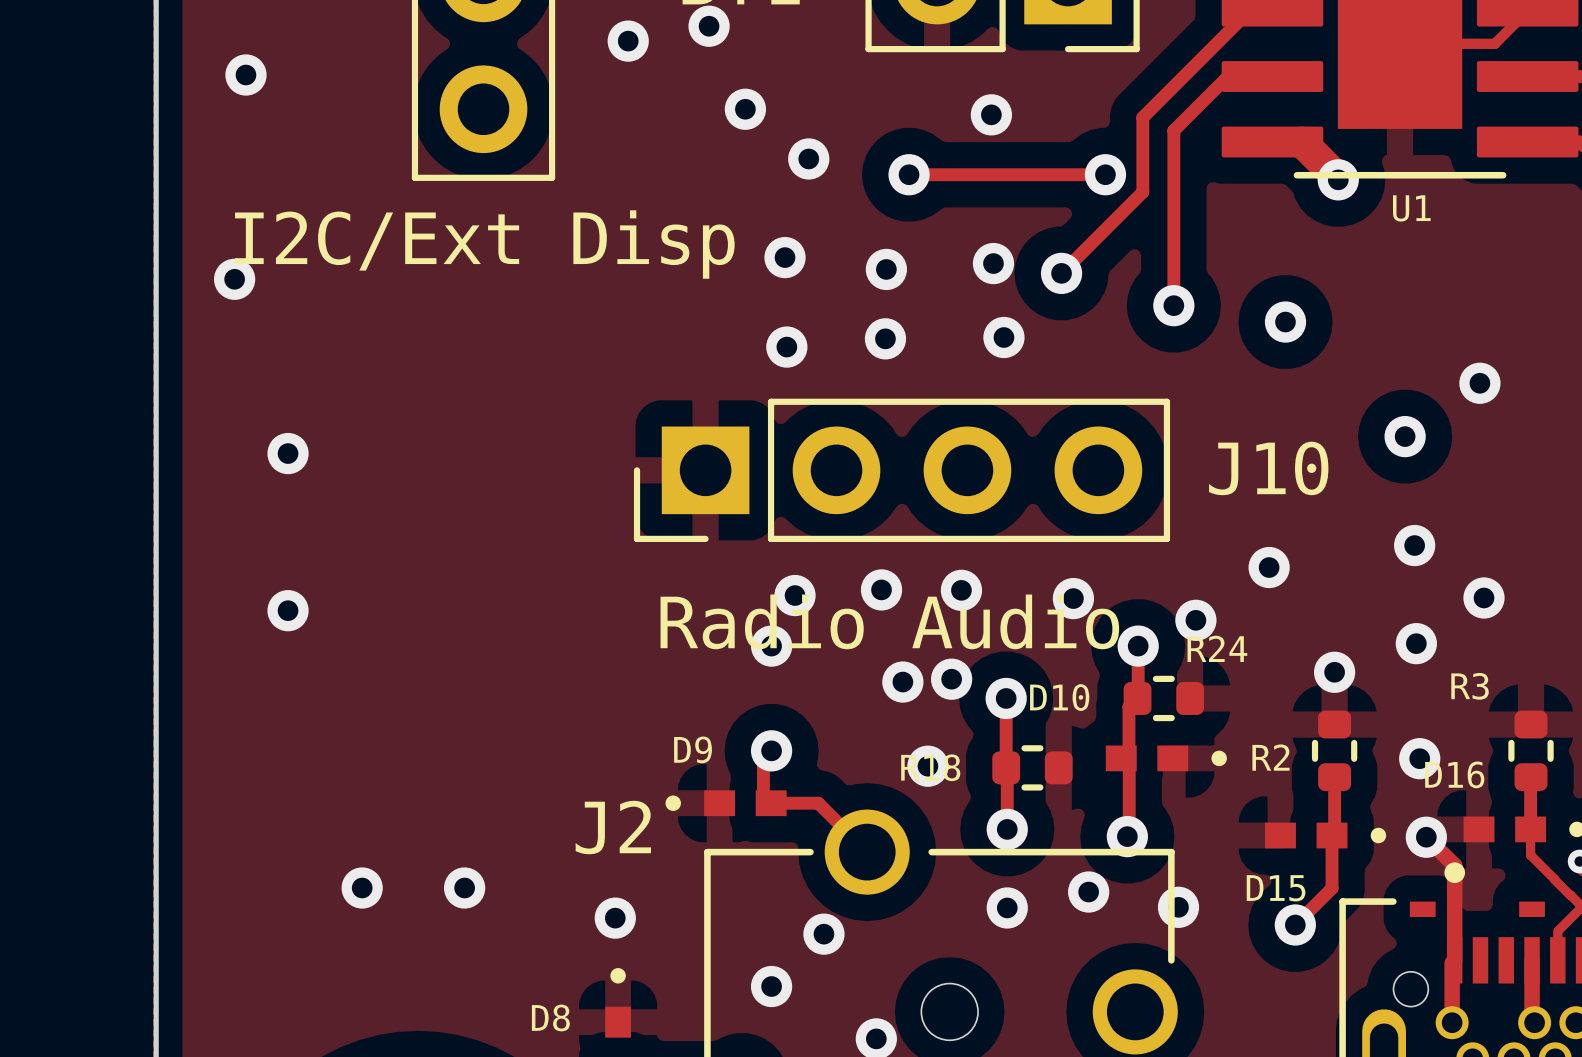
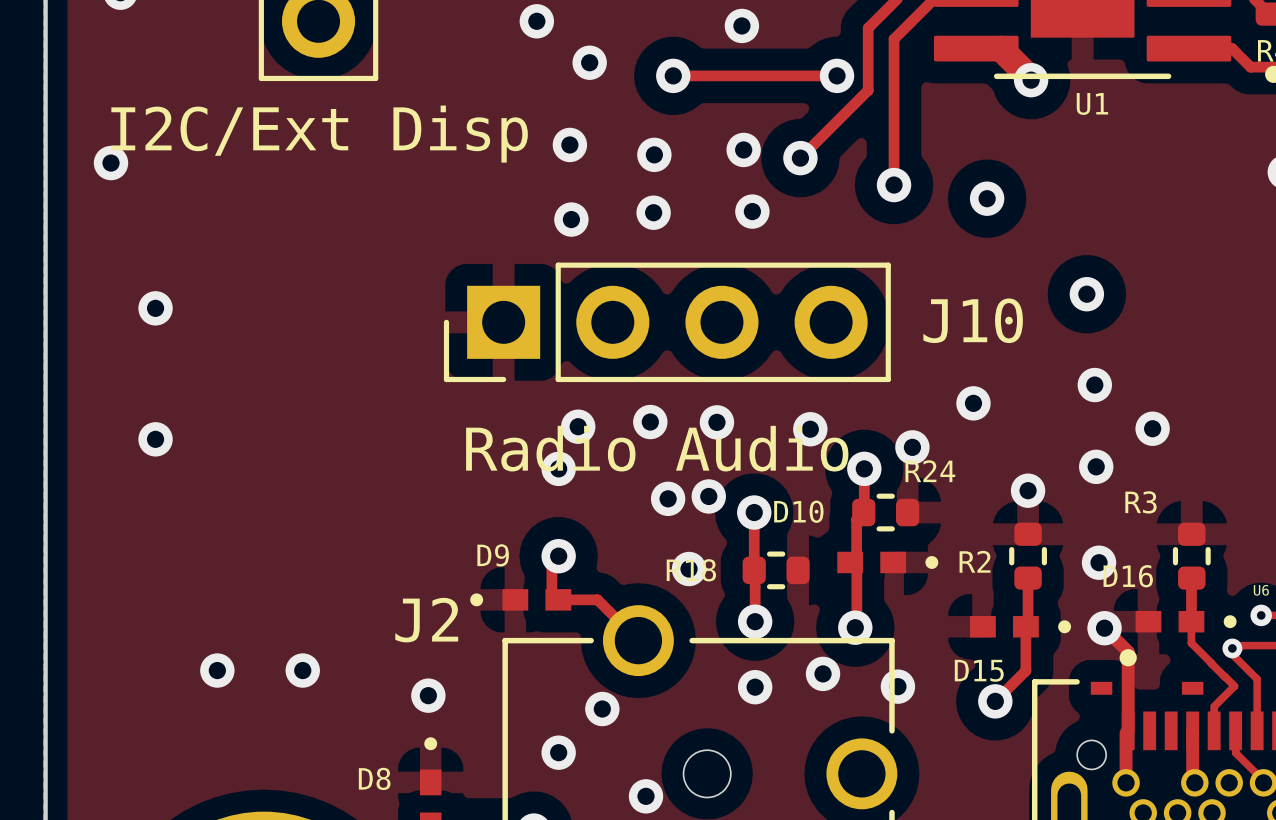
via: (1479, 383) -> none

